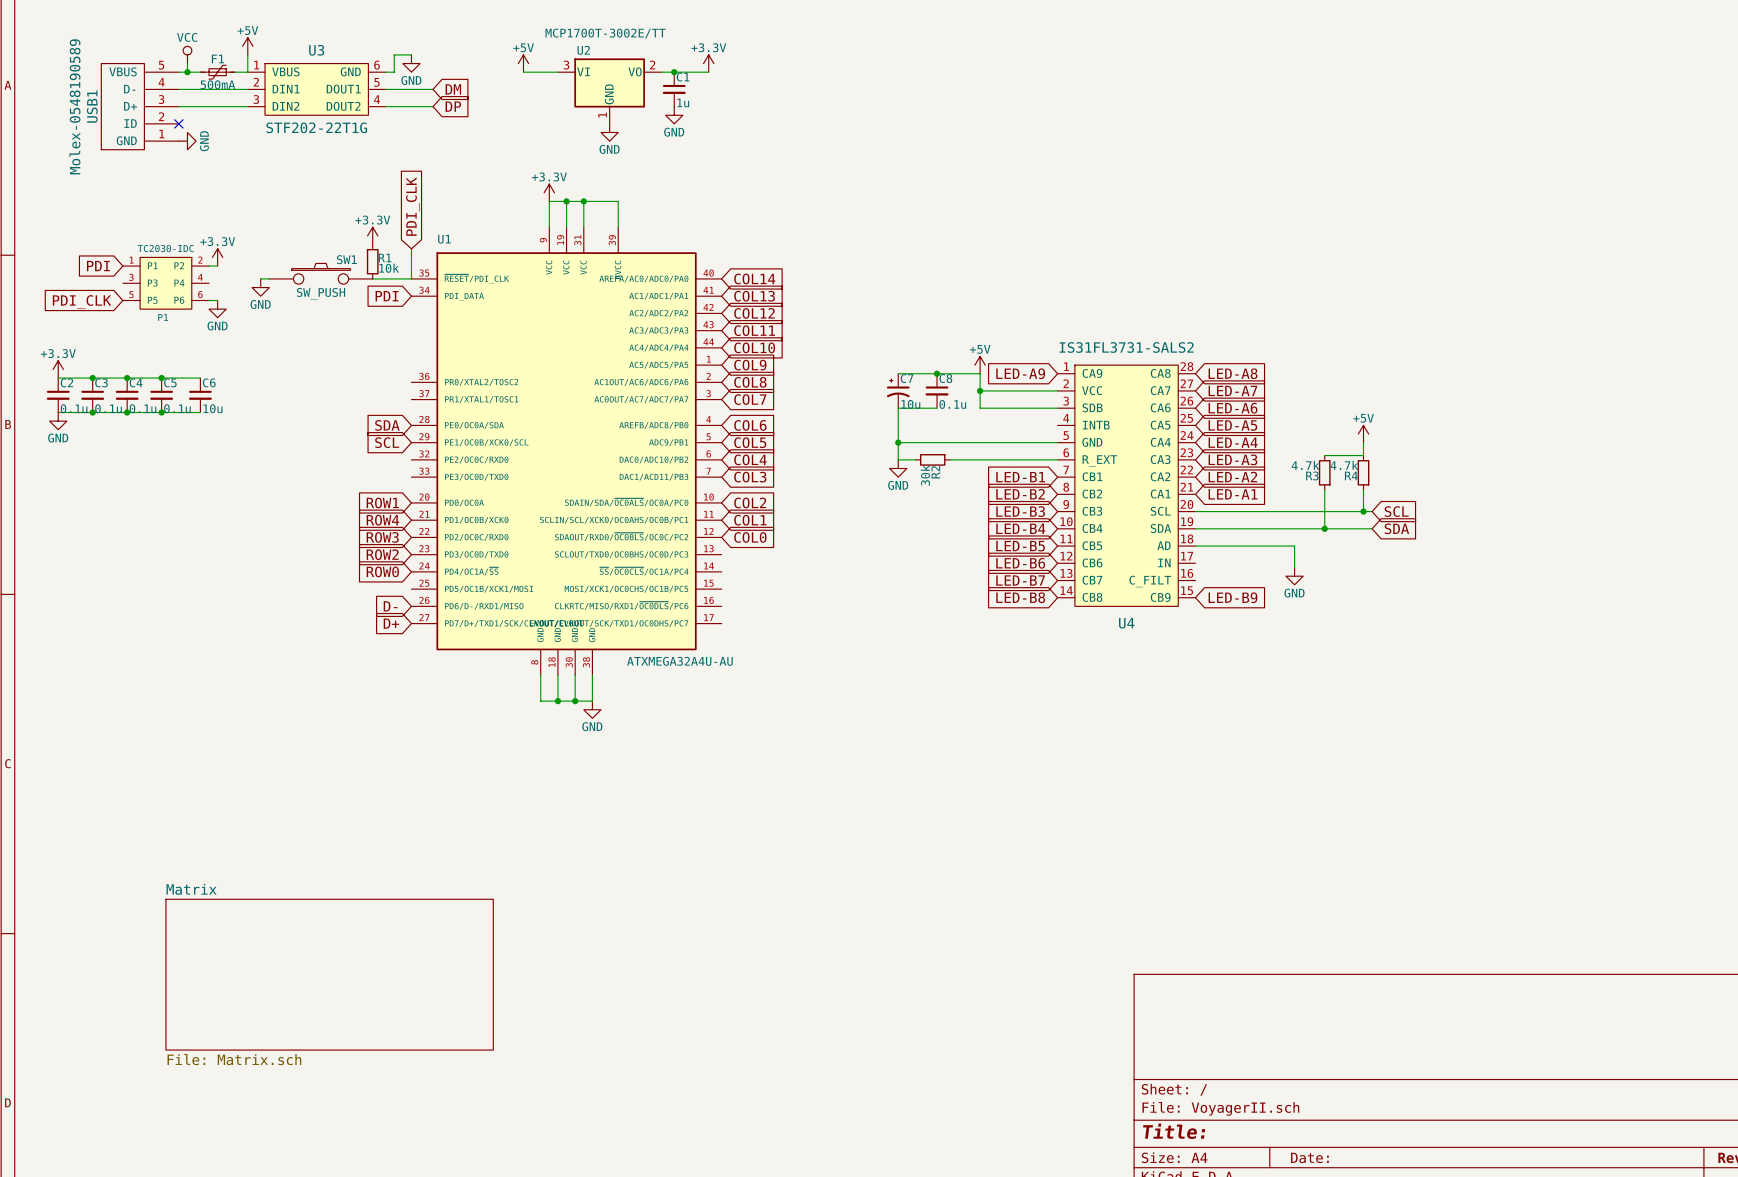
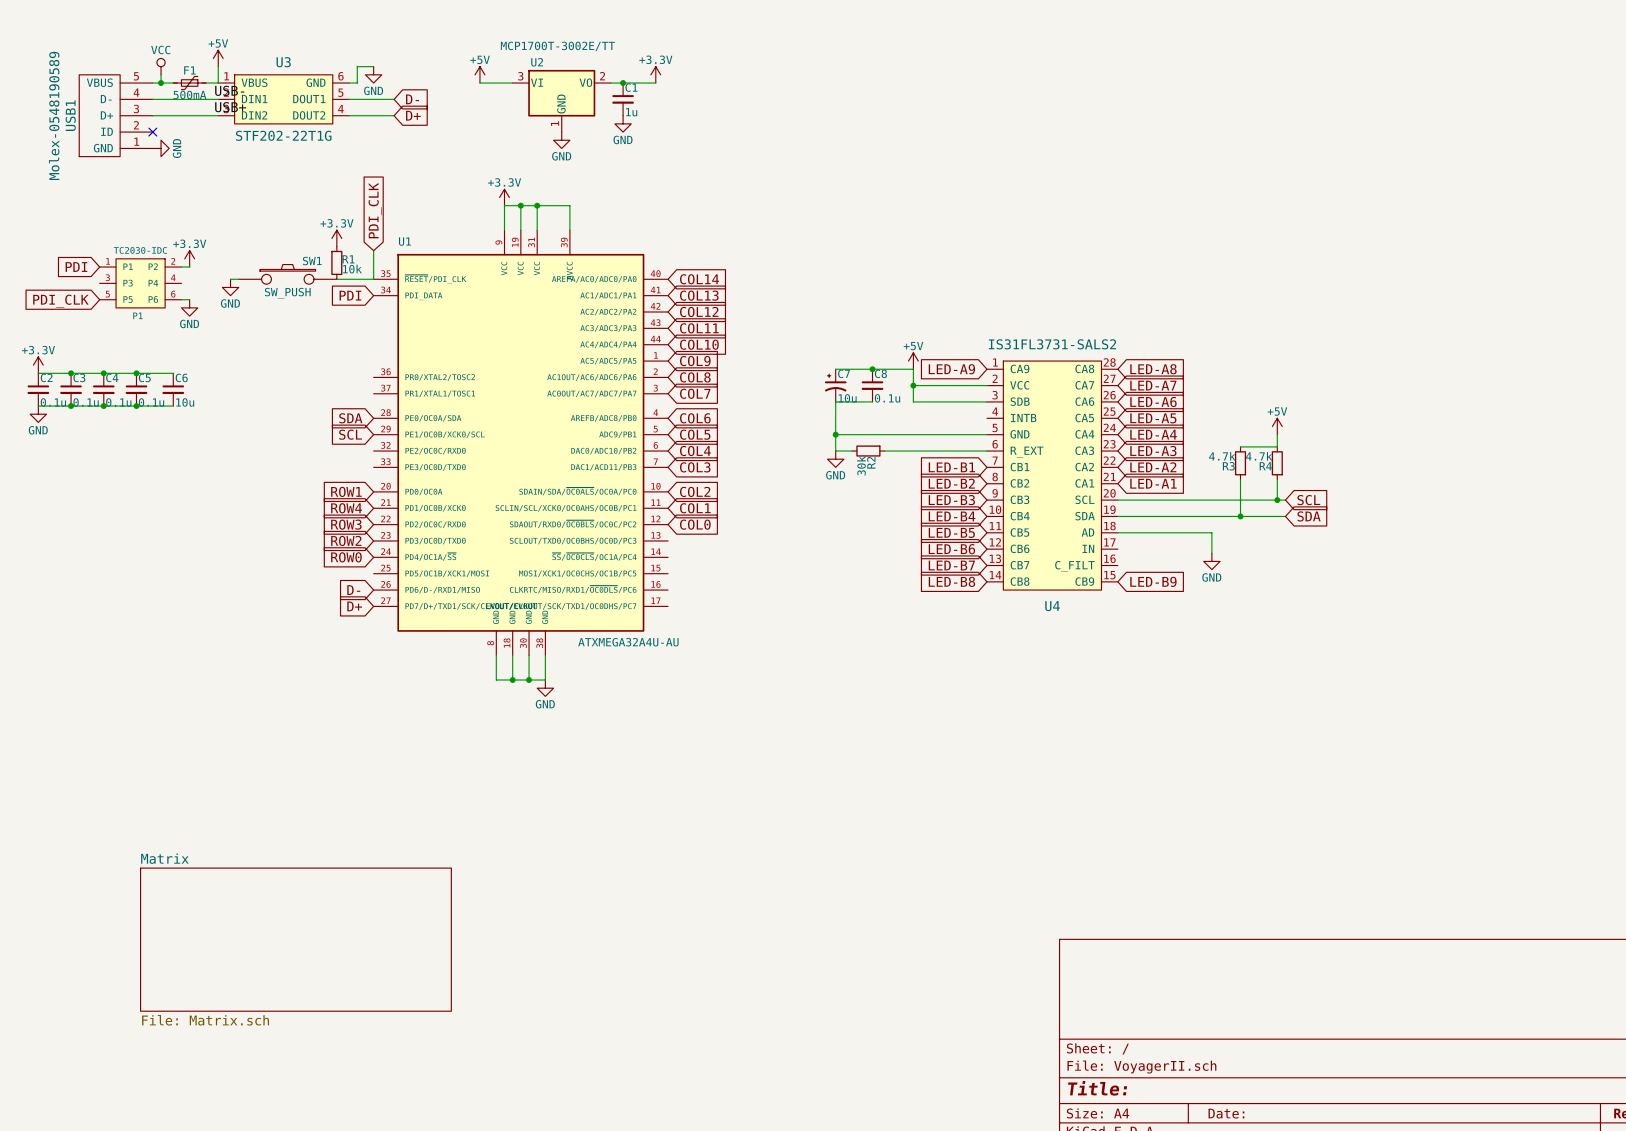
label: none -> USB- (229, 90)
global label: DM (453, 89) -> D- (412, 99)
label: none -> USB+ (230, 107)
global label: DP (453, 106) -> D+ (413, 115)

